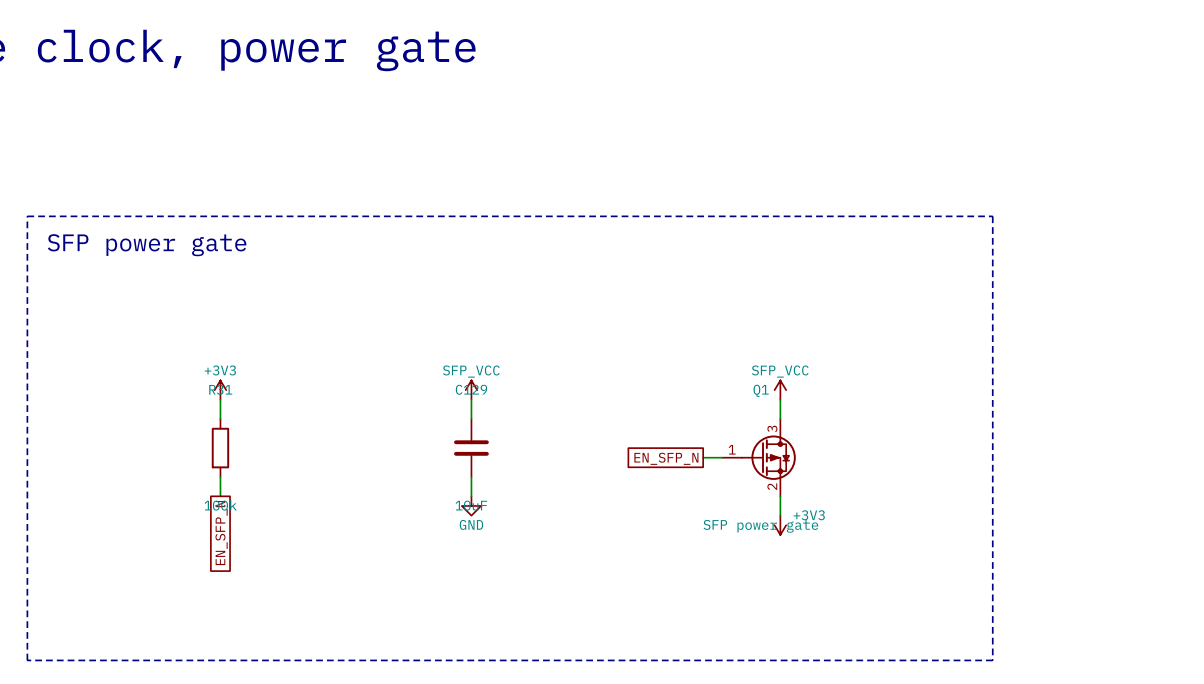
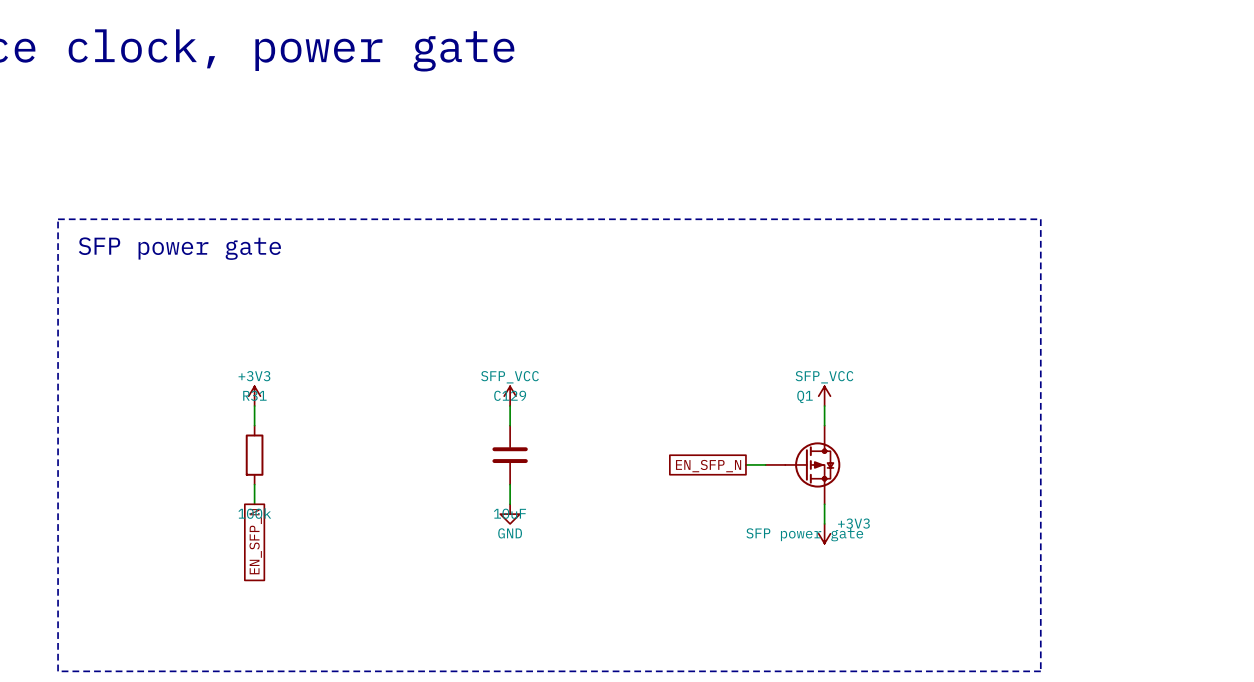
Q1 pin number: 3 (772, 428) -> none
Q1 pin number: 1 (732, 449) -> none
Q1 pin number: 2 (772, 486) -> none

